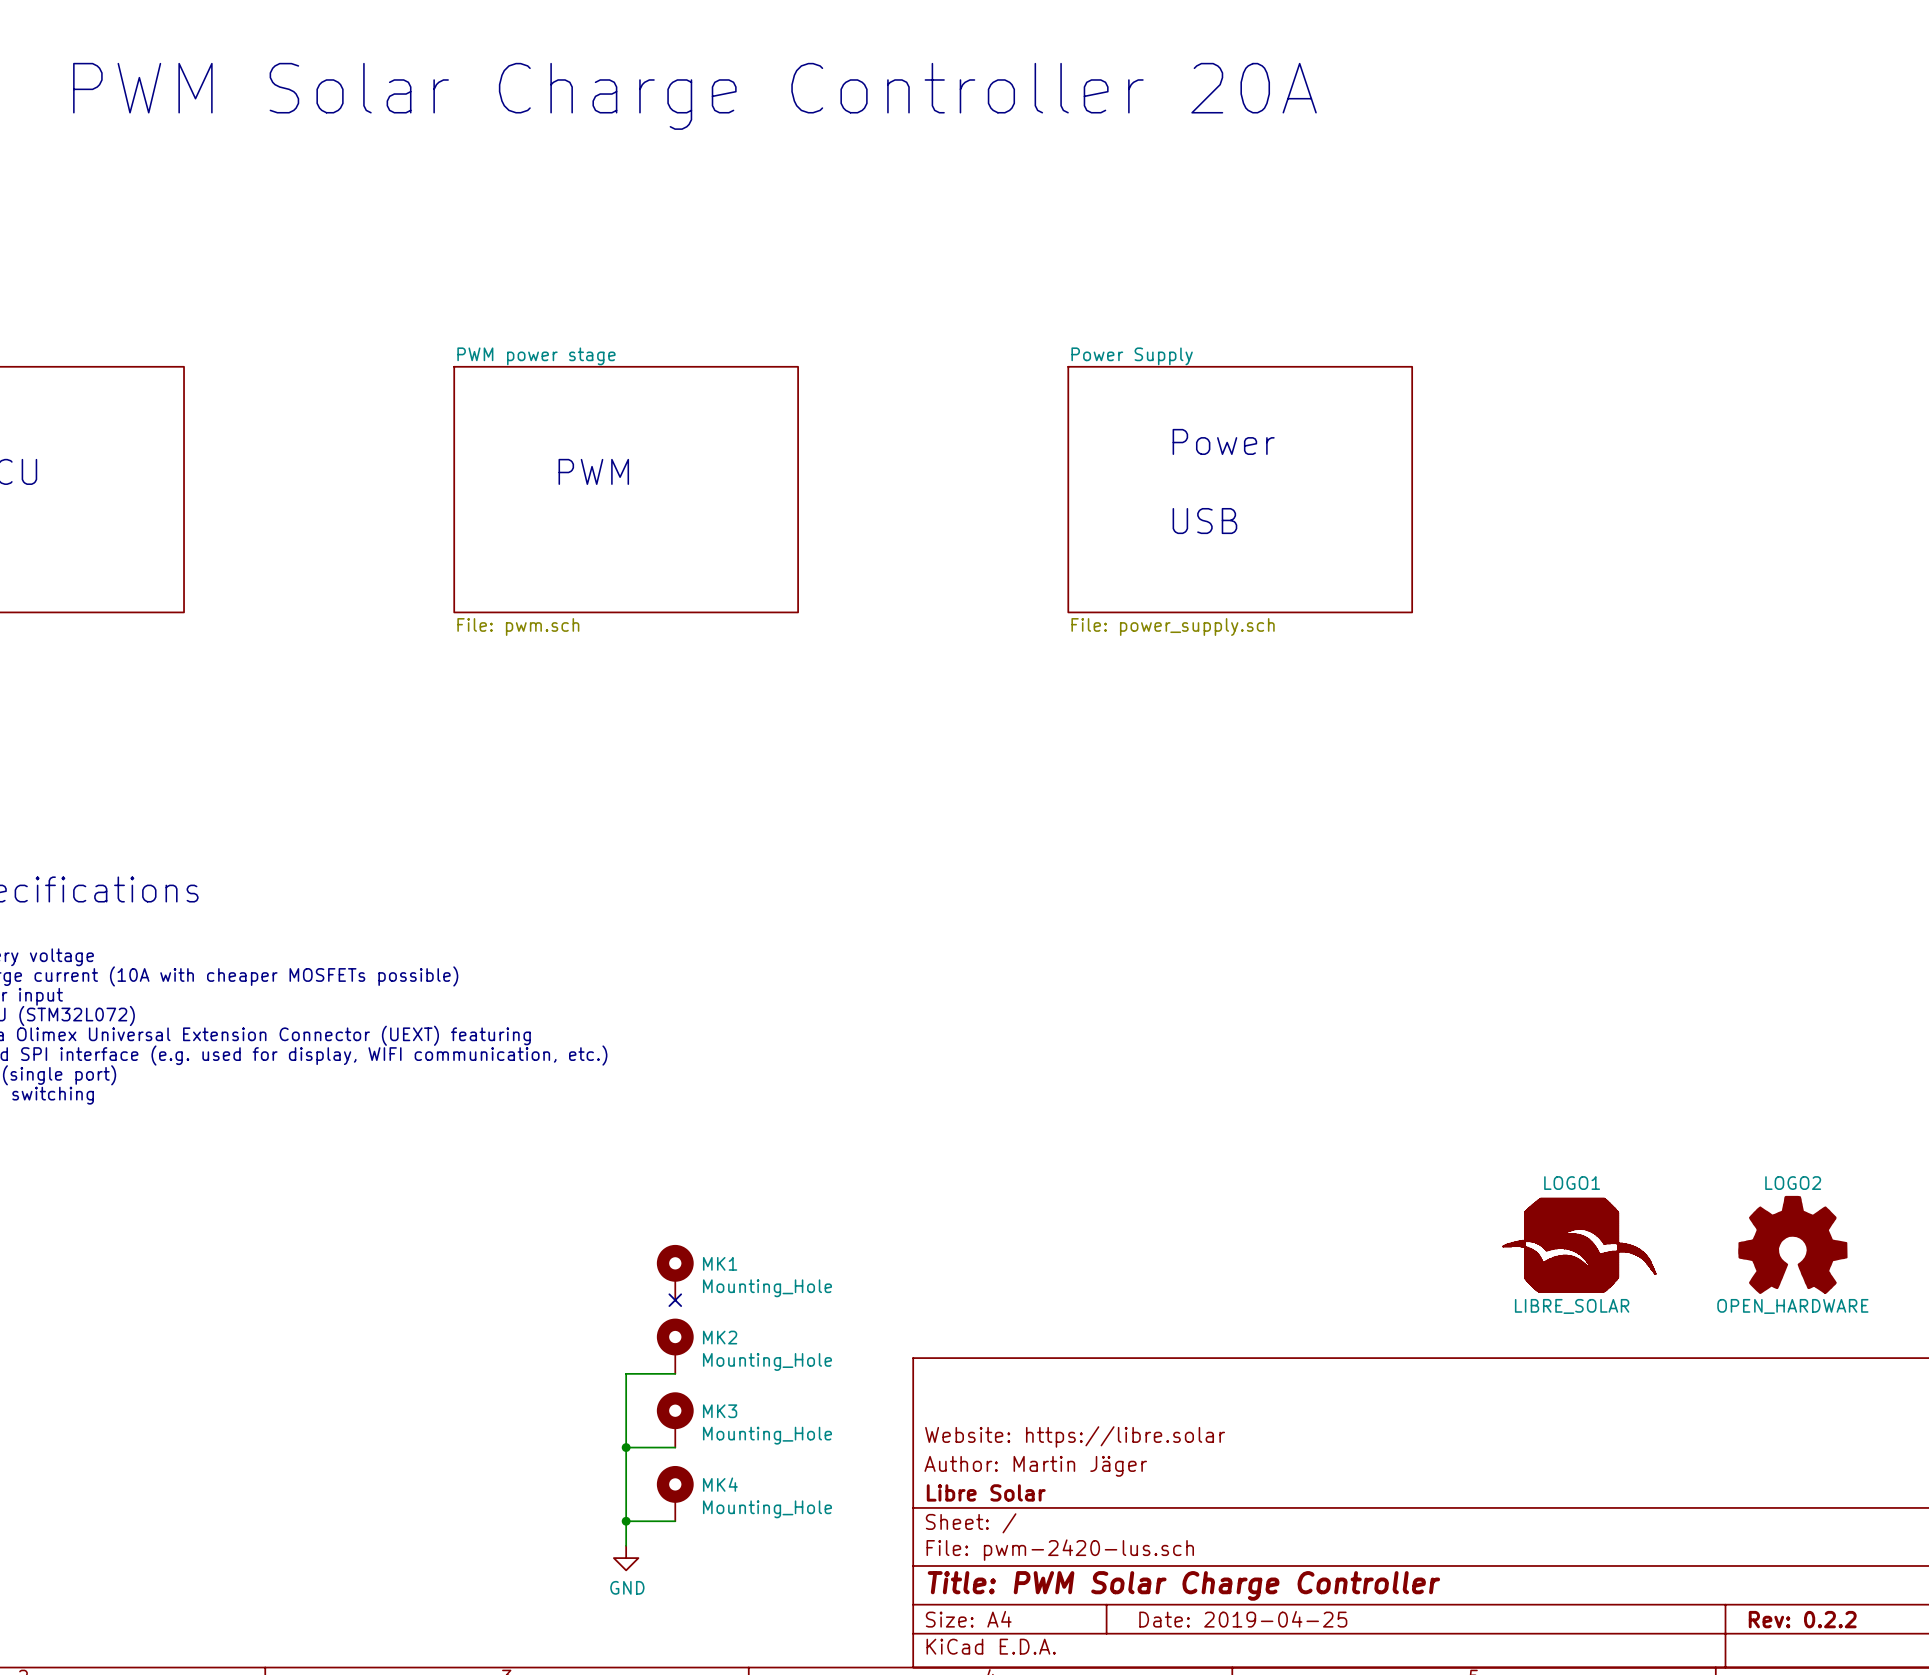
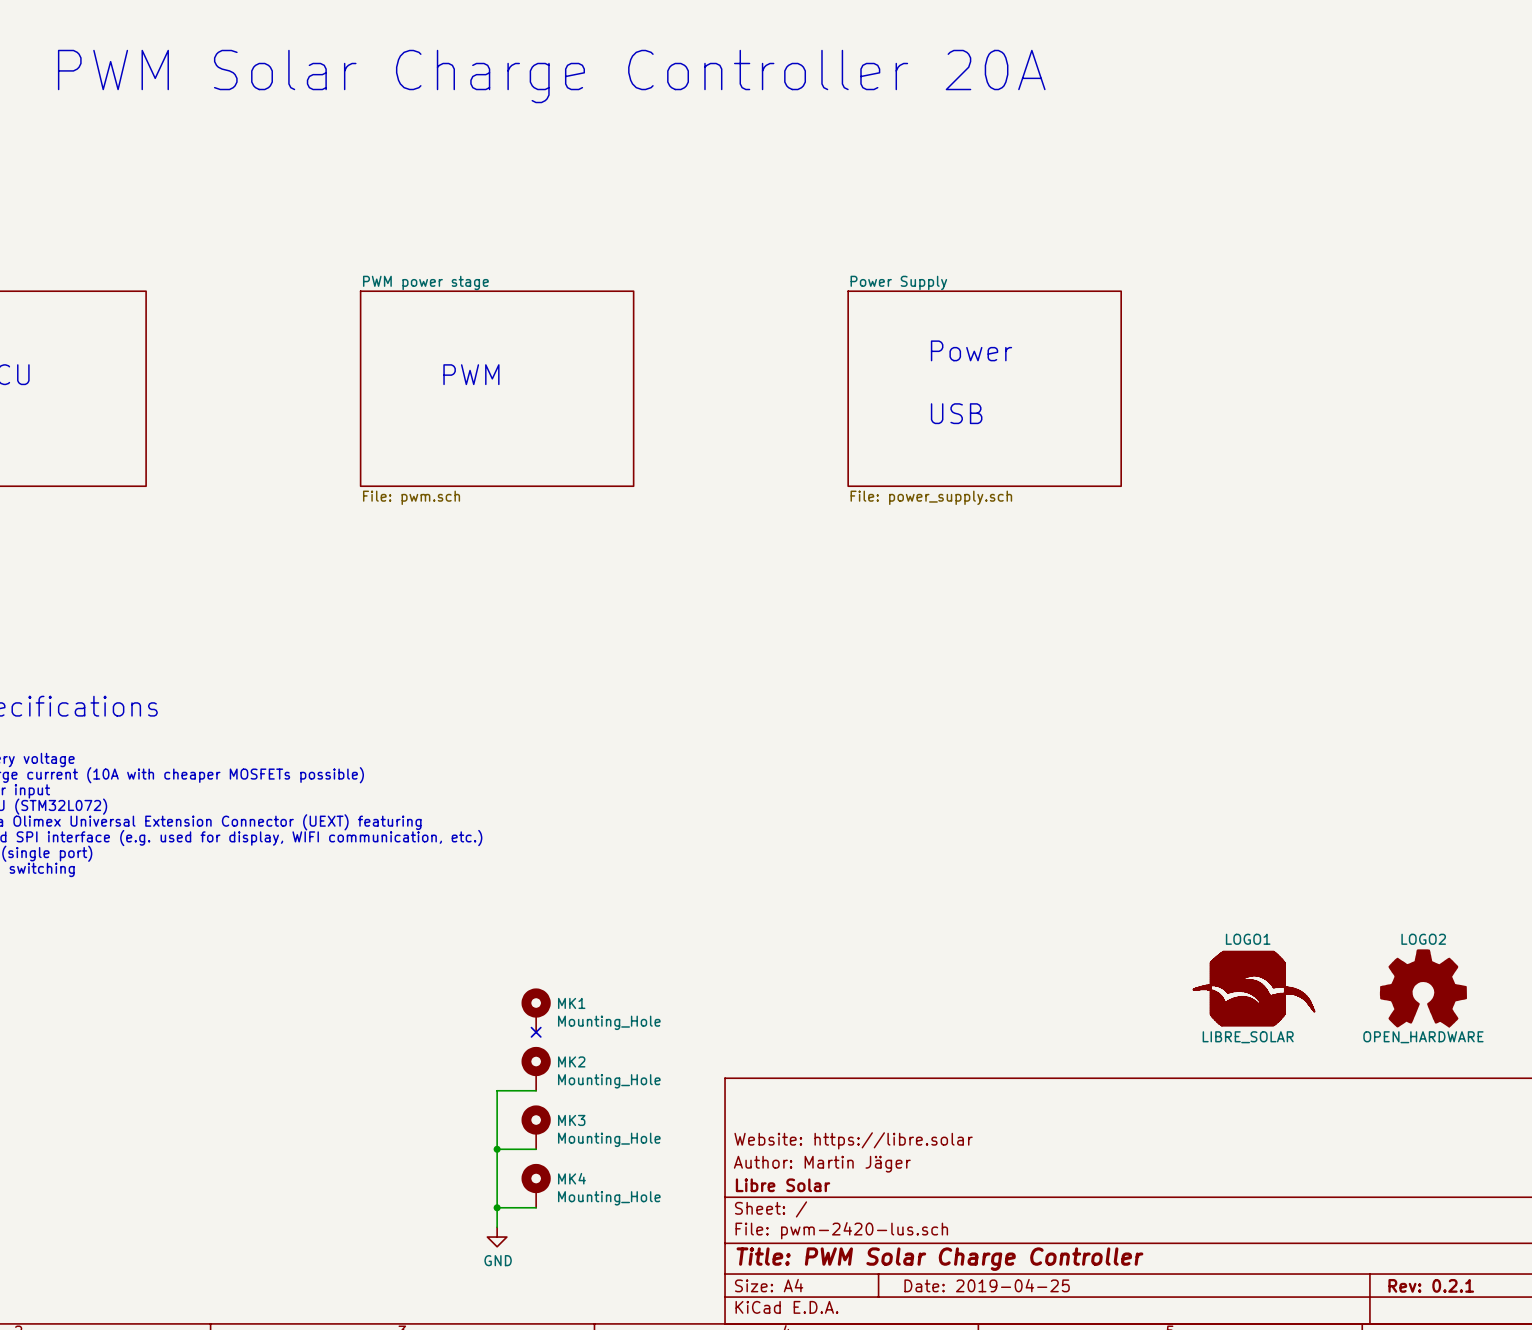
title block: Rev: 0.2.2 (1802, 1619) -> Rev: 0.2.1 (1431, 1285)

